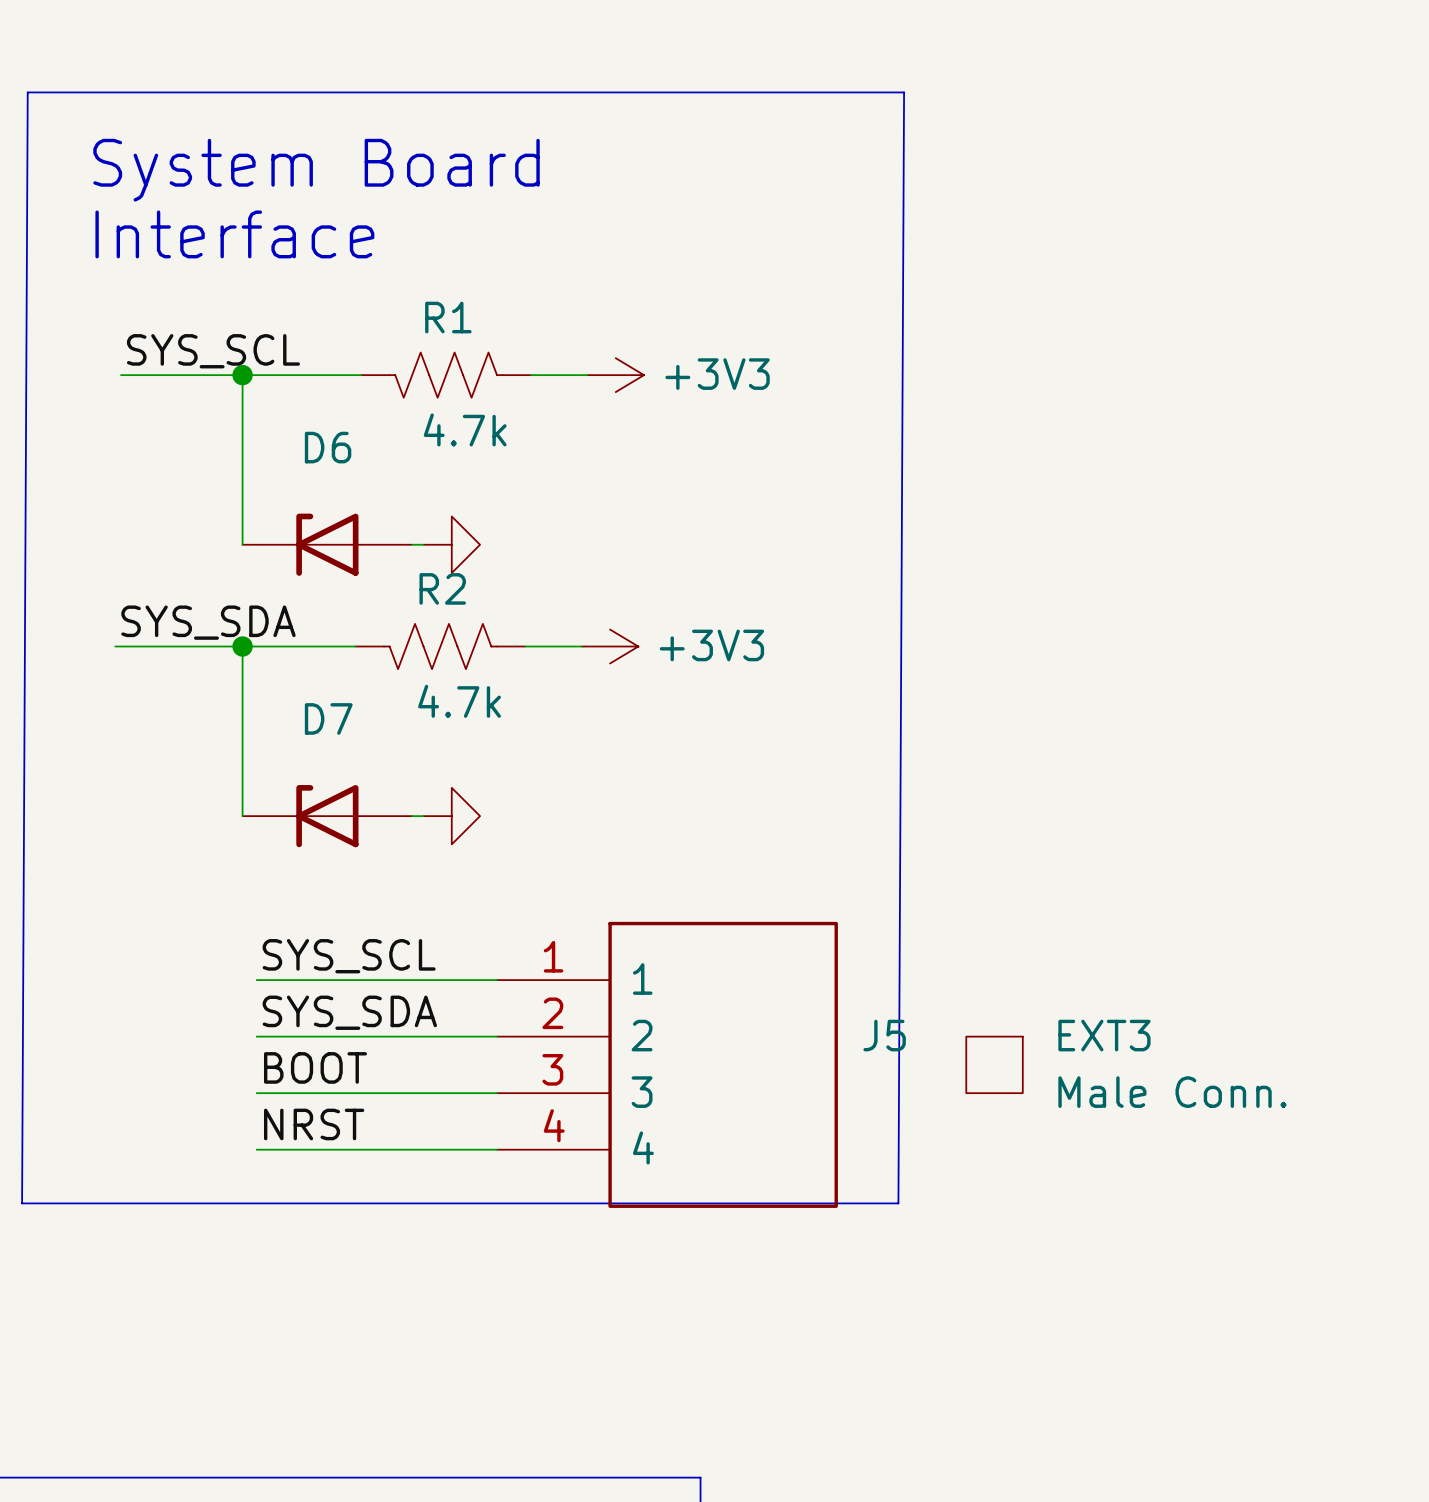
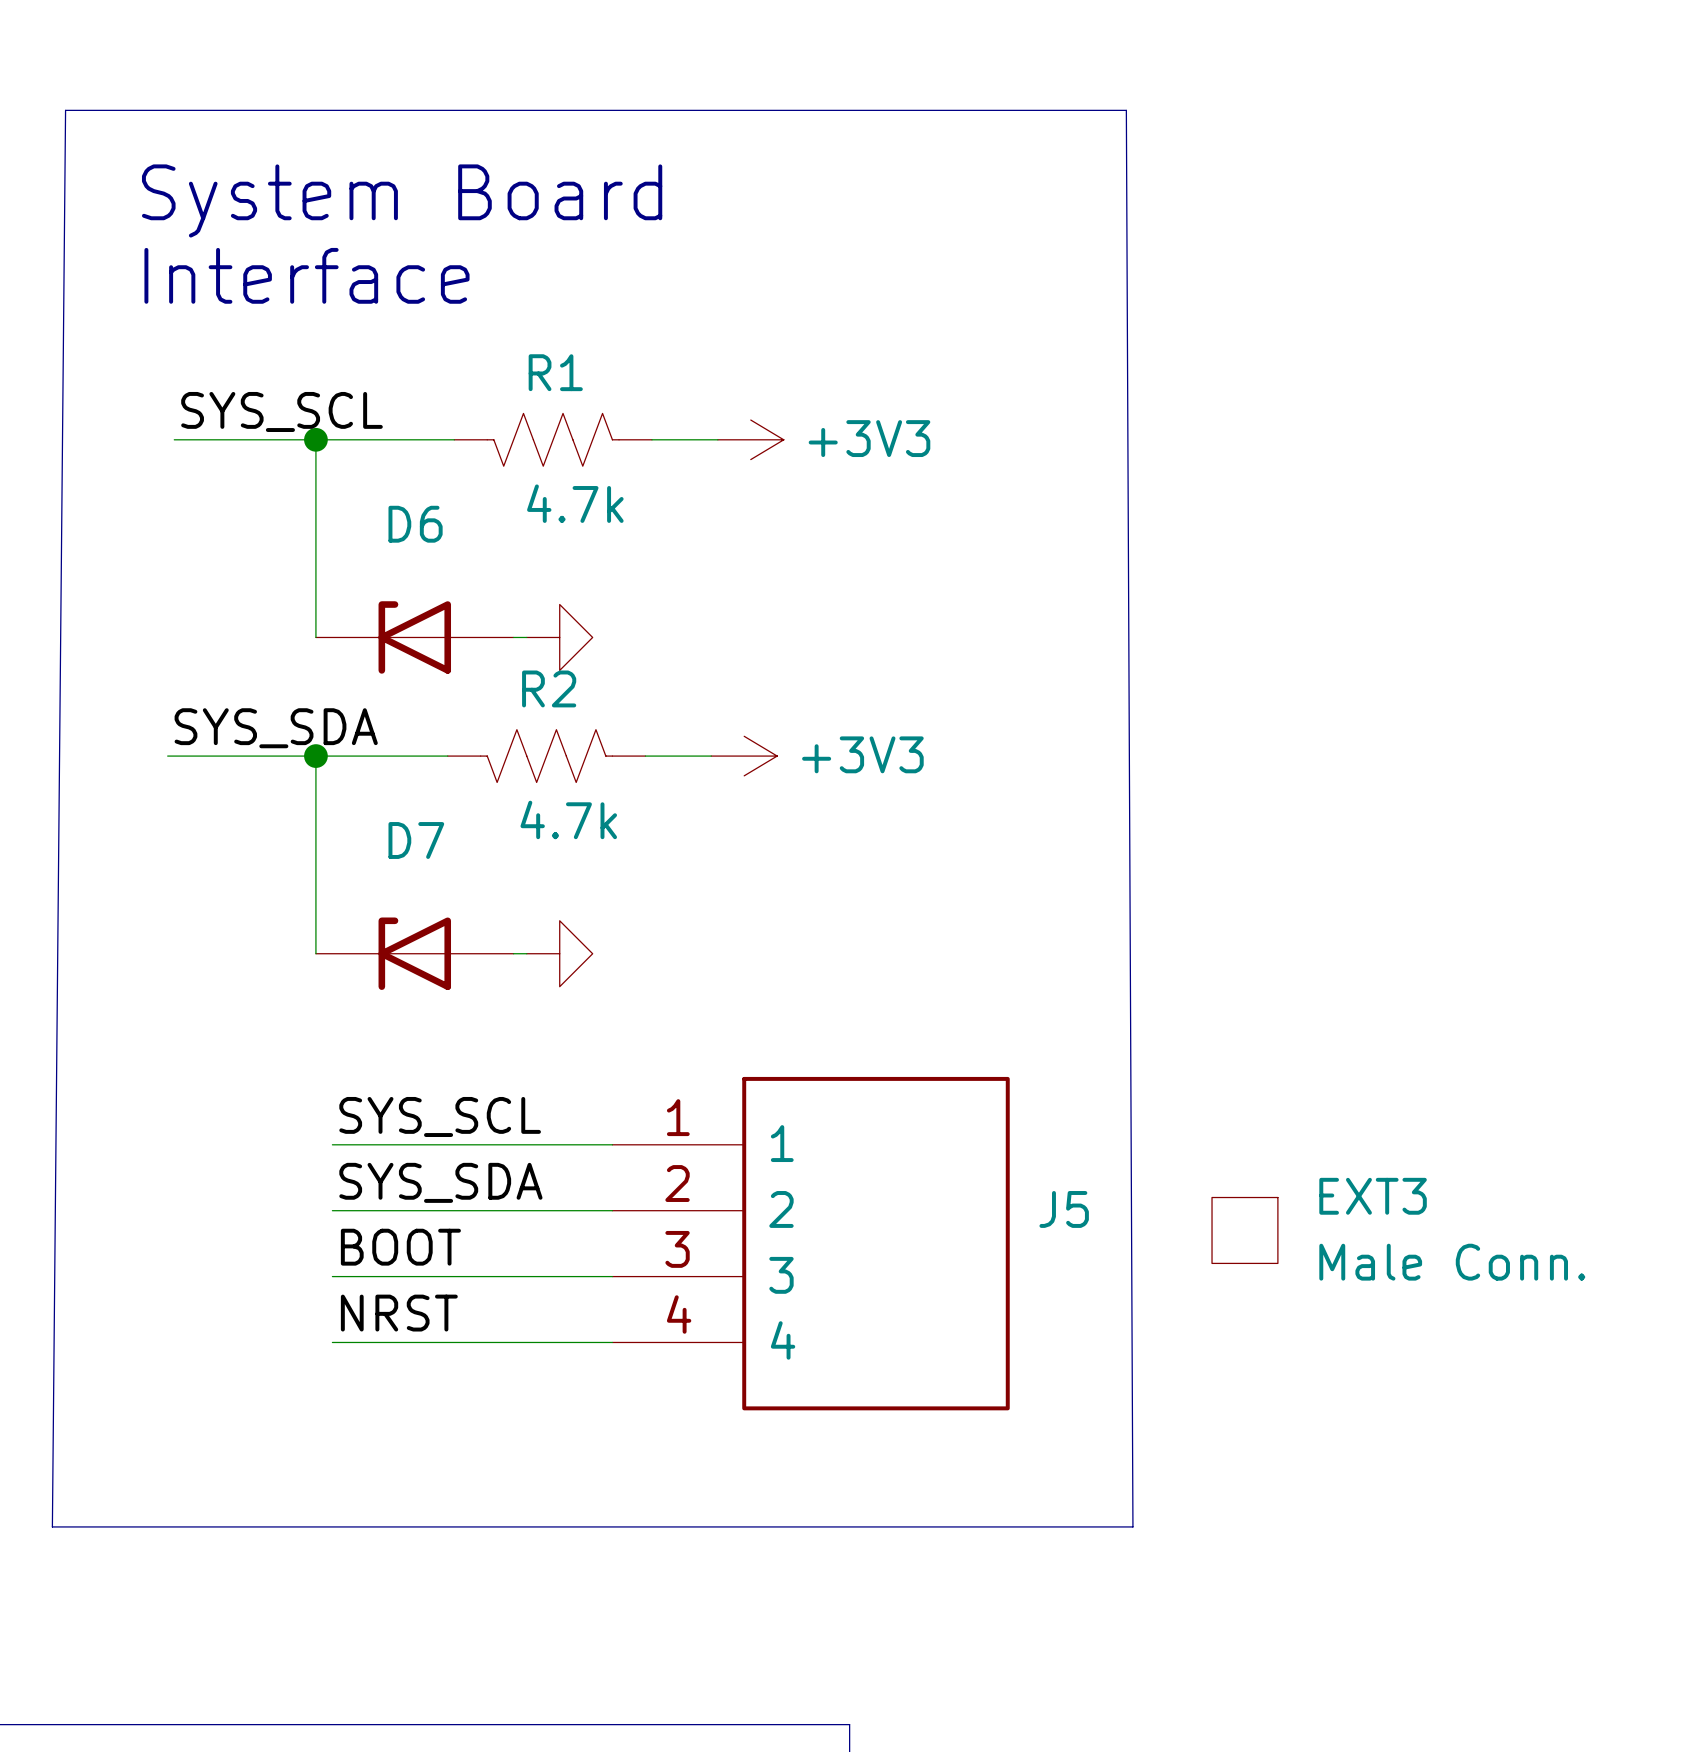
line: (27, 92) (22, 1203) (898, 1203) (904, 92) -> (65, 110) (52, 1526) (1132, 1526) (1126, 110) (1086, 110)
EXT3 position: (994, 1064) -> (1244, 1230)

